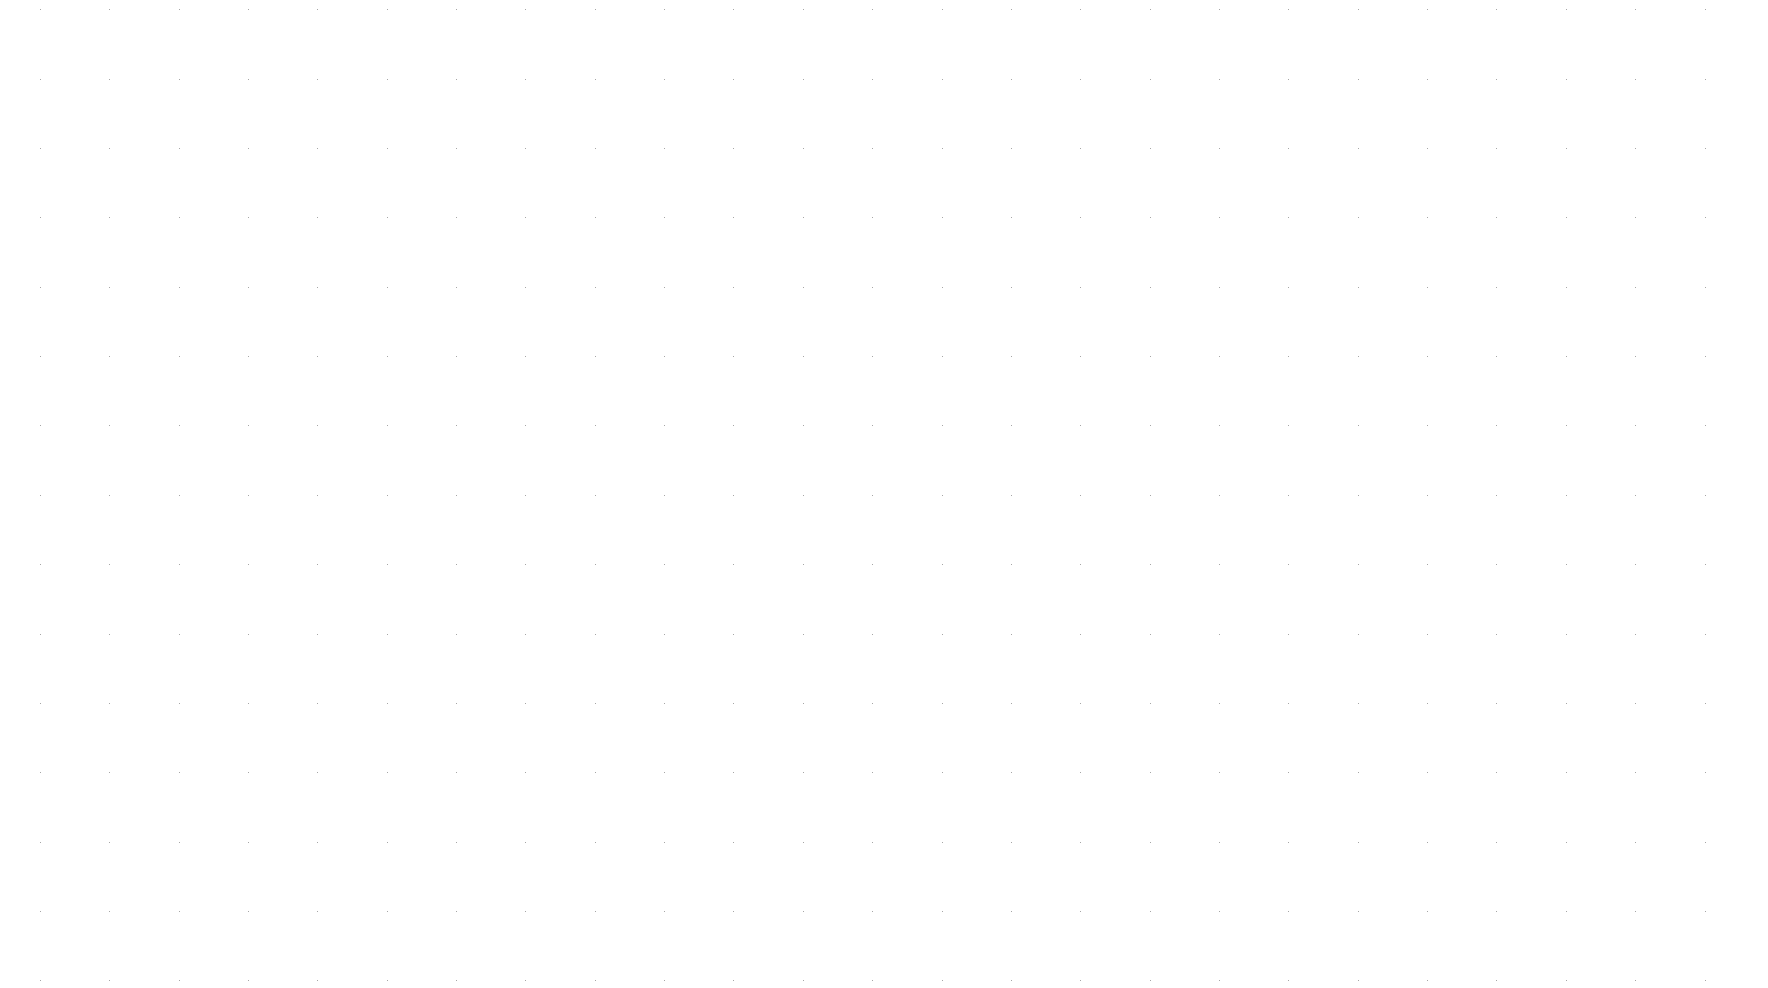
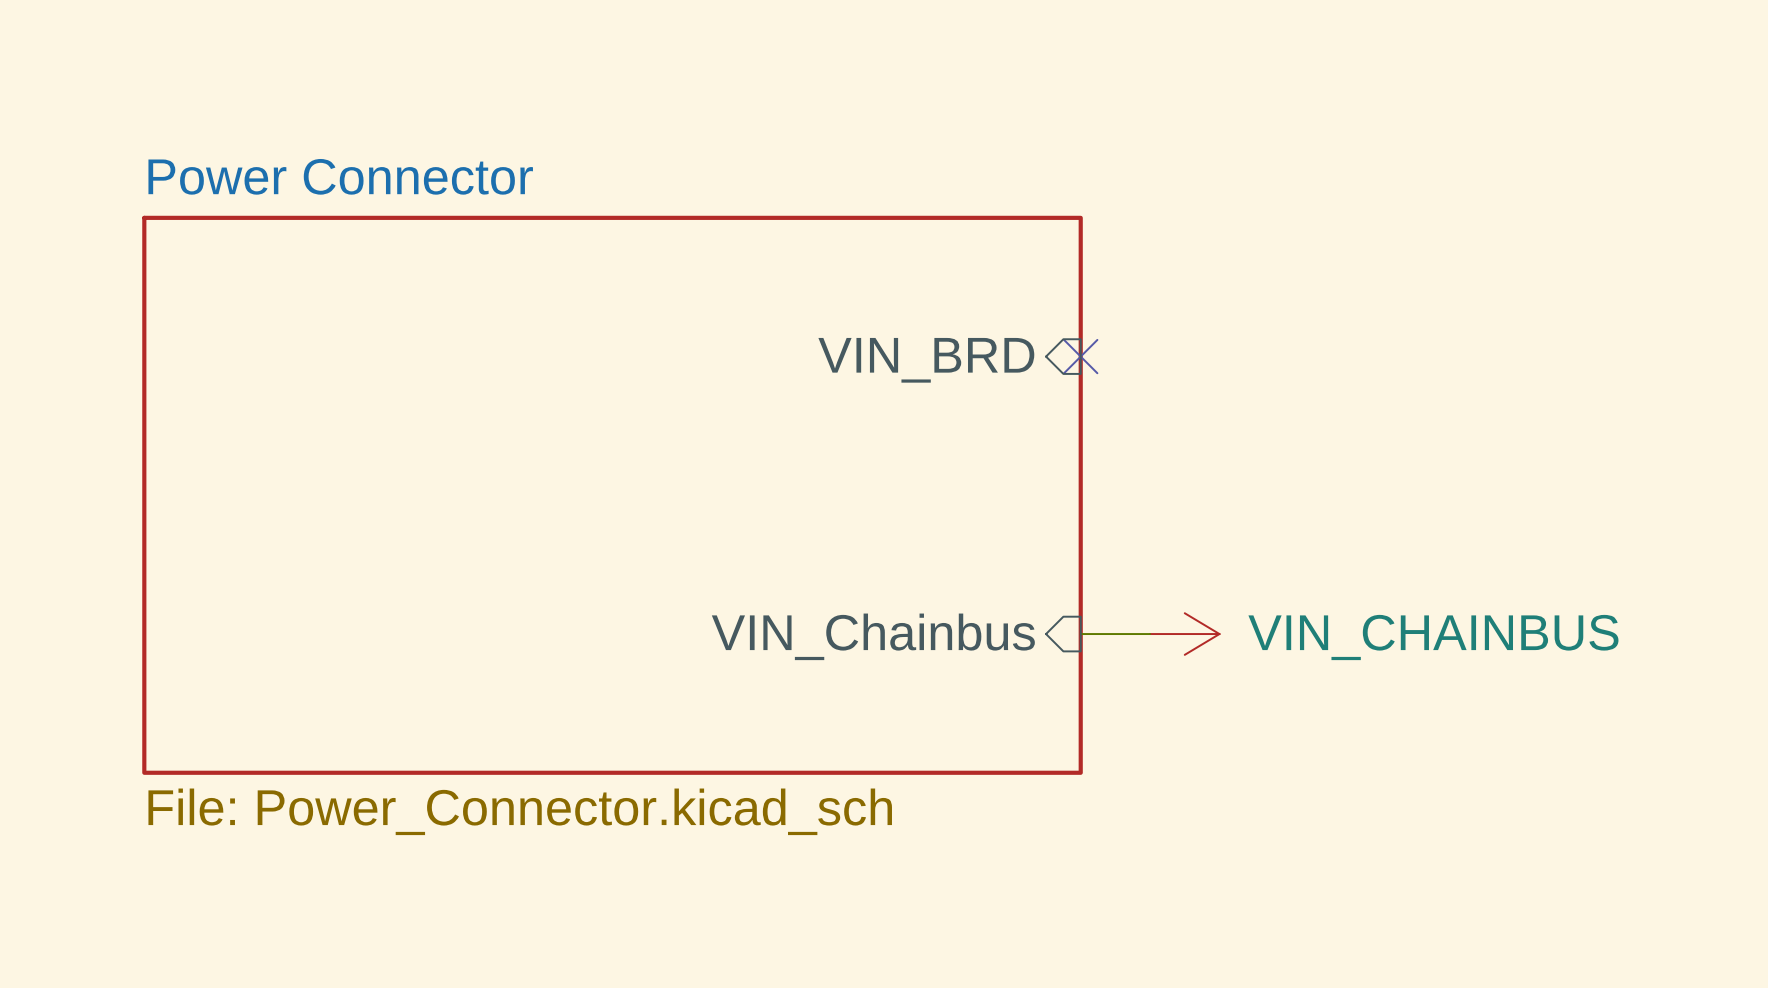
no-connect mark: none -> (1080, 356)
sheet pin: none -> VIN_BRD (926, 360)
sheet Power Connector: none -> File: Power_Connector.kicad_sch (612, 495)
wire: none -> (1080, 634) (1150, 634)
power symbol: none -> VIN_CHAINBUS (1184, 634)
sheet pin: none -> VIN_Chainbus (873, 636)

